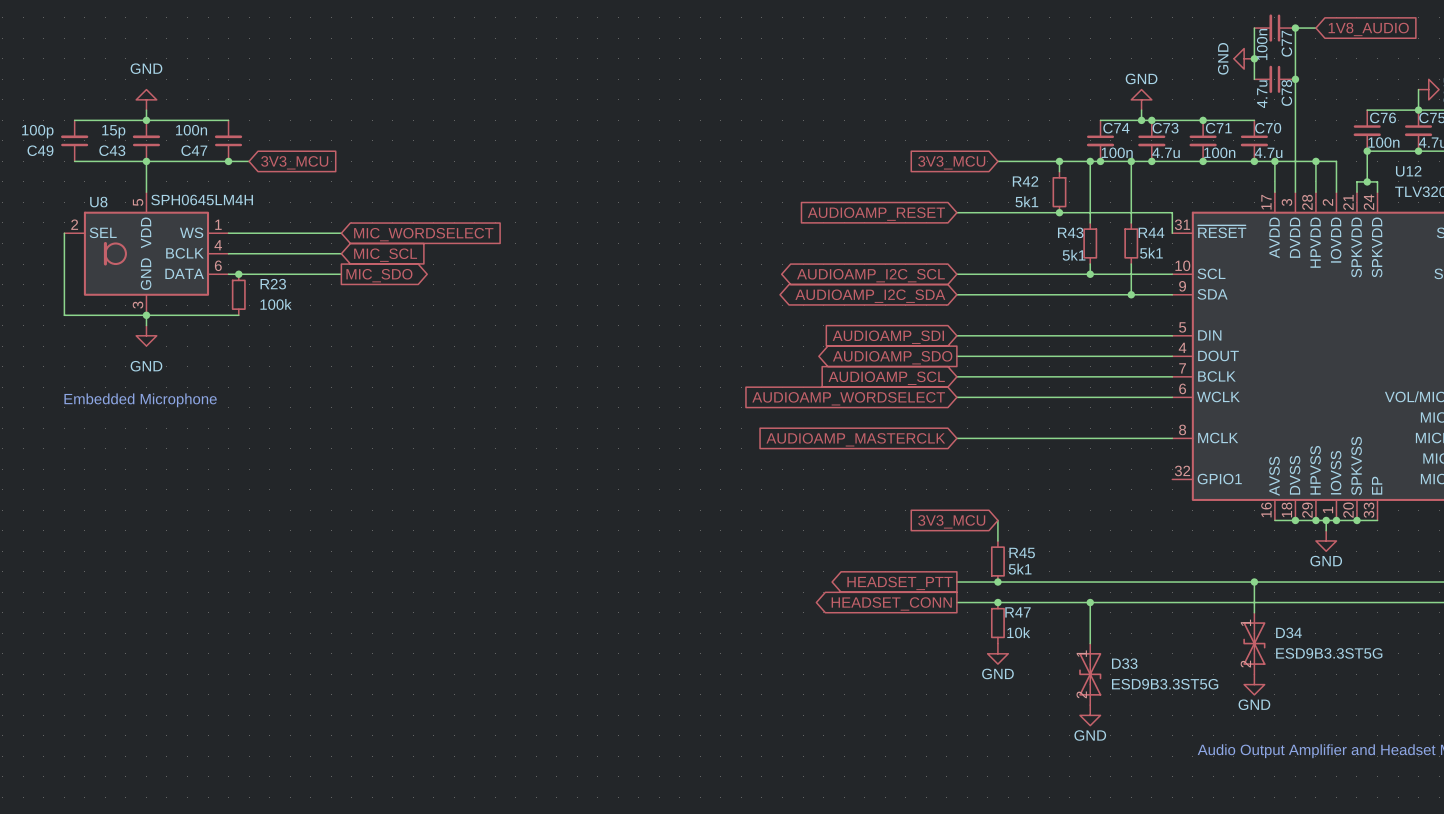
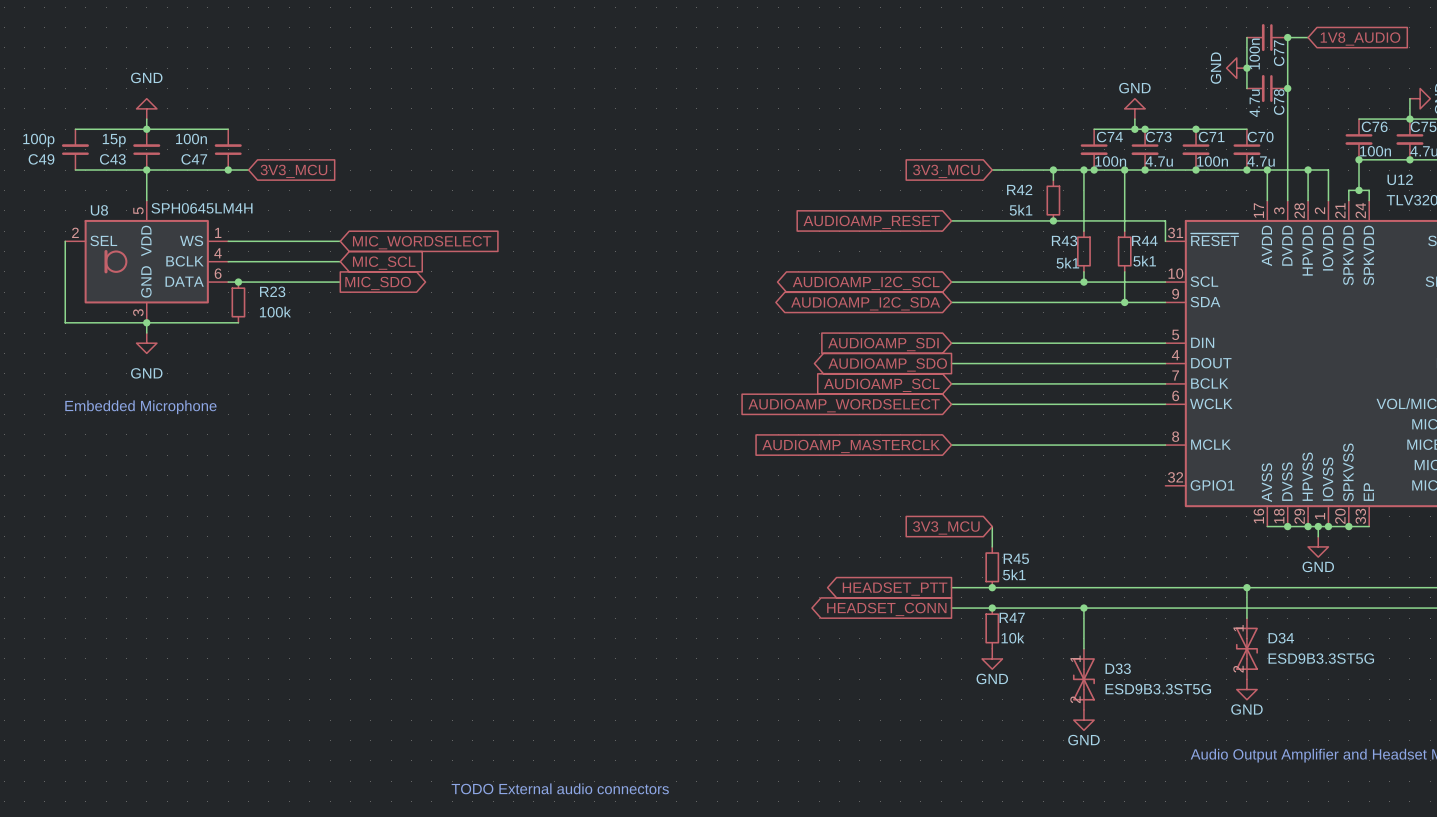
text: none -> TODO External audio connectors (560, 788)

